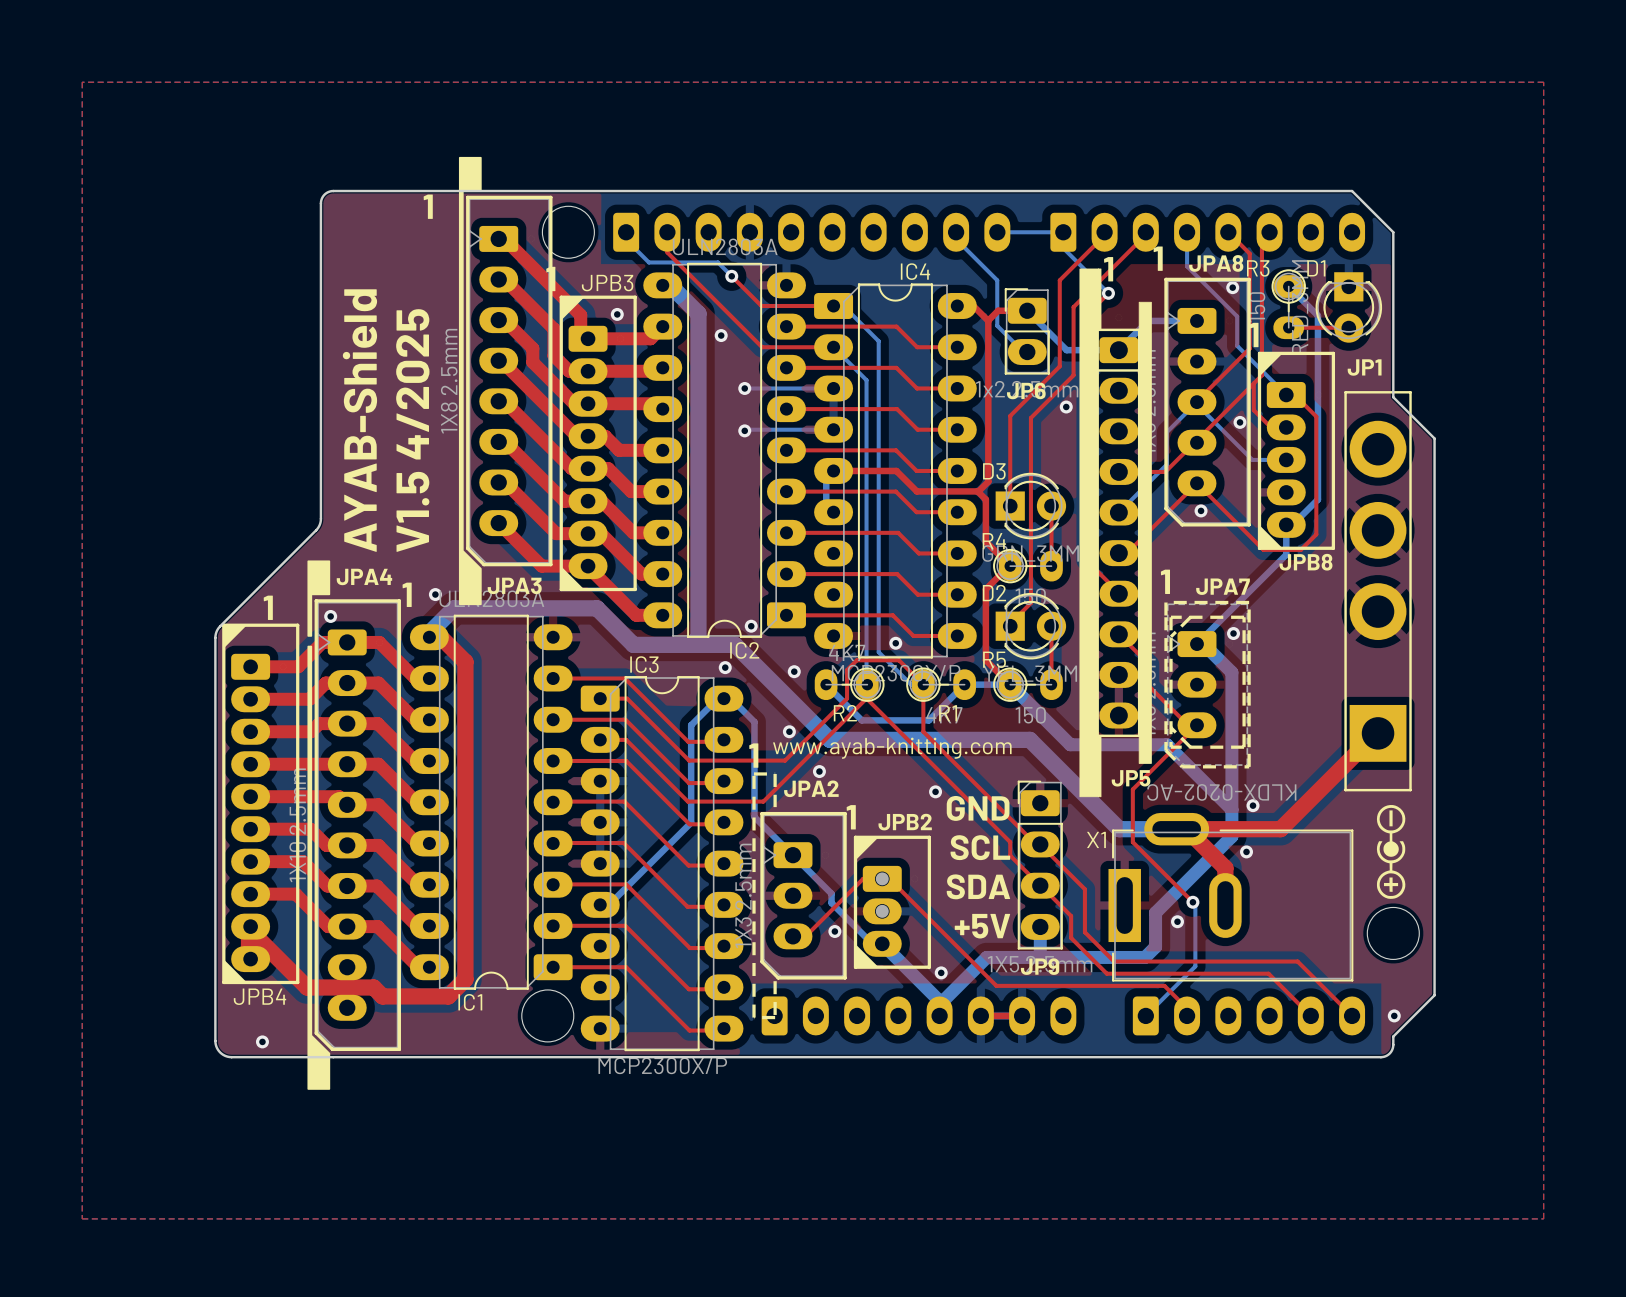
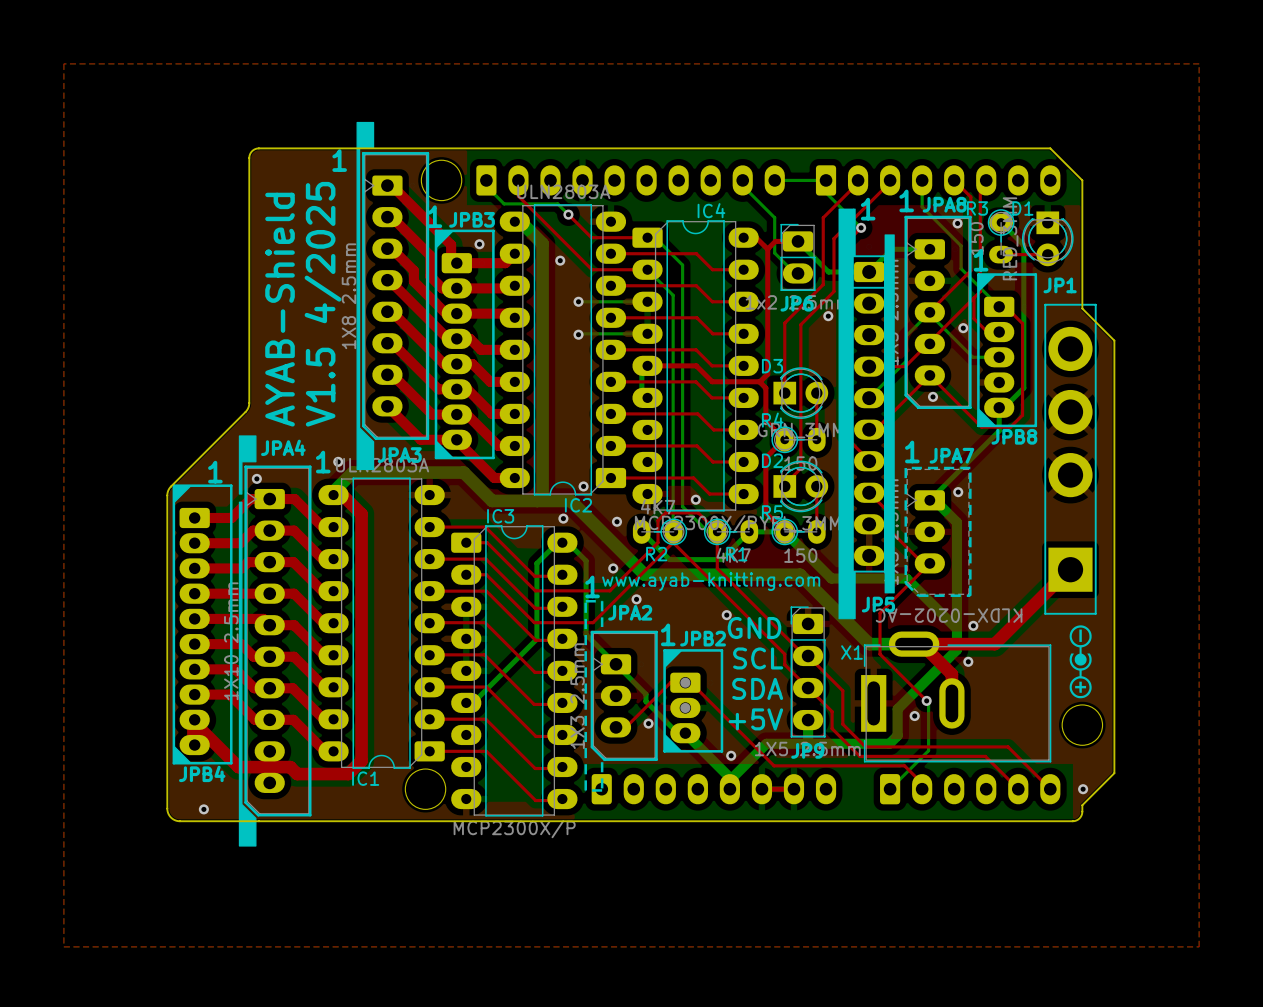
JPA7 footprint: [1164, 600, 1251, 769] -> [904, 466, 972, 597]

